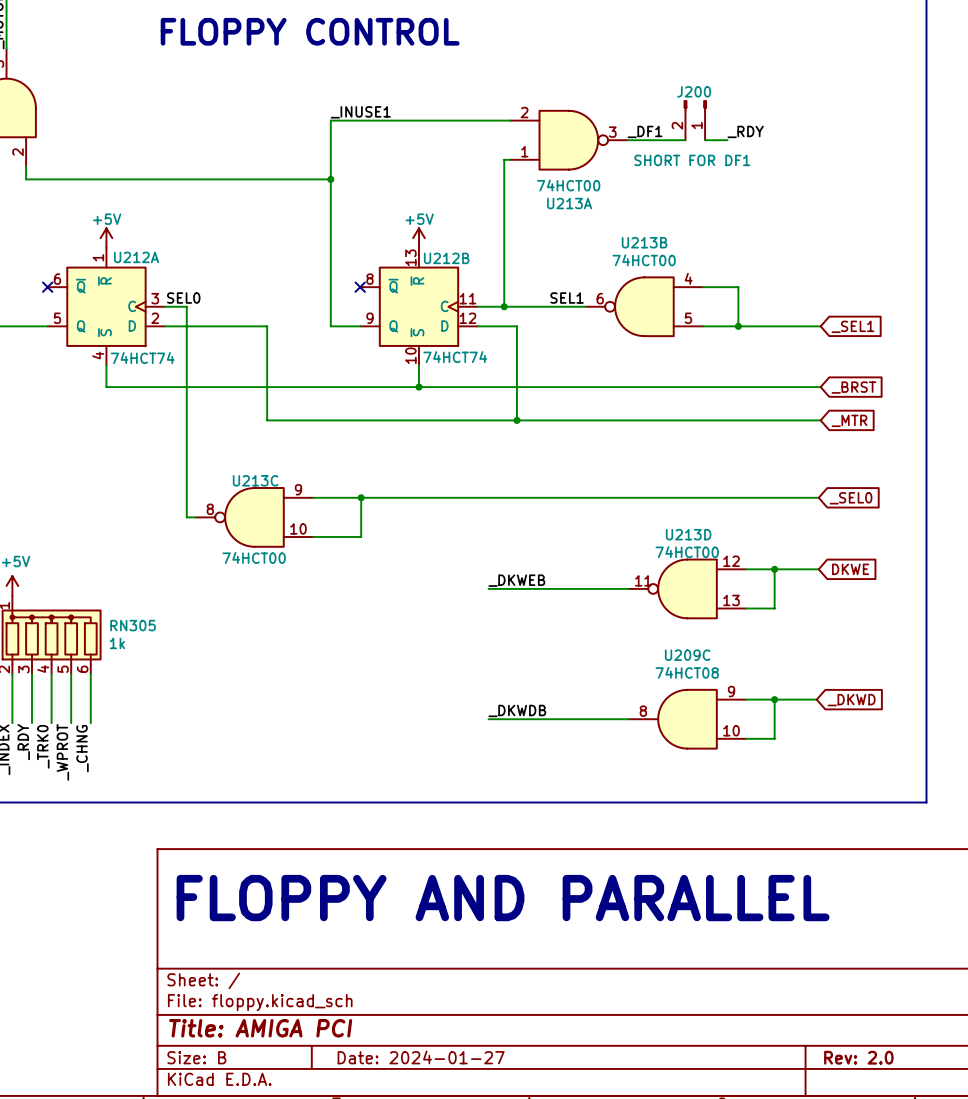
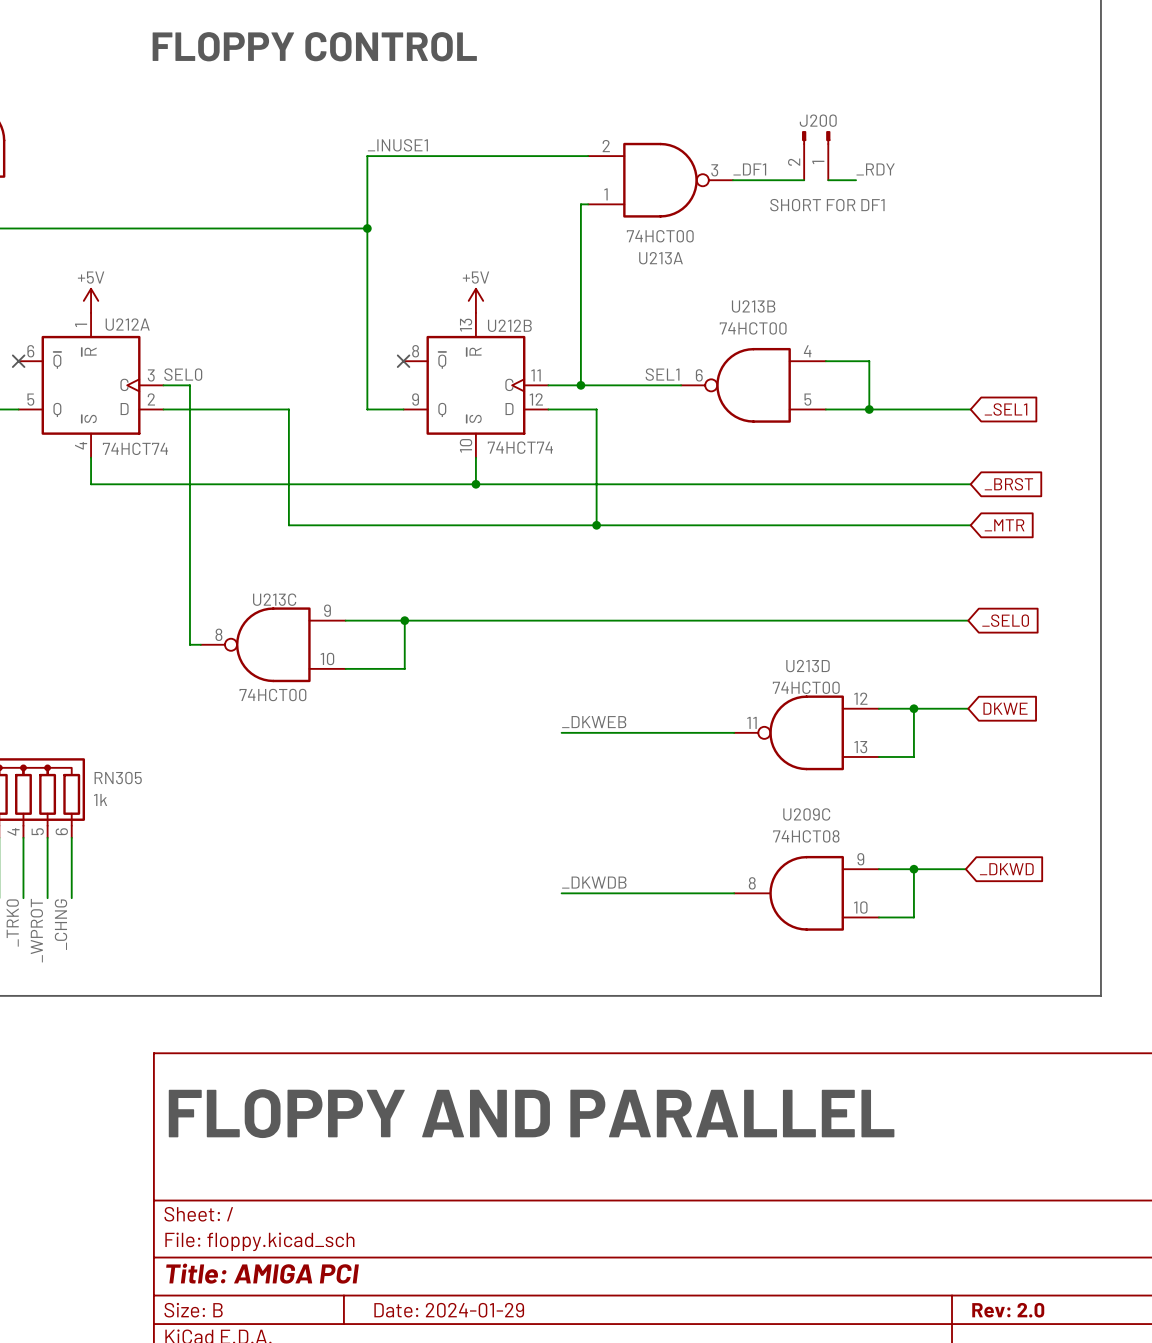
title block: Date: 2024-01-27 (421, 1057) -> Date: 2024-01-29 (449, 1310)

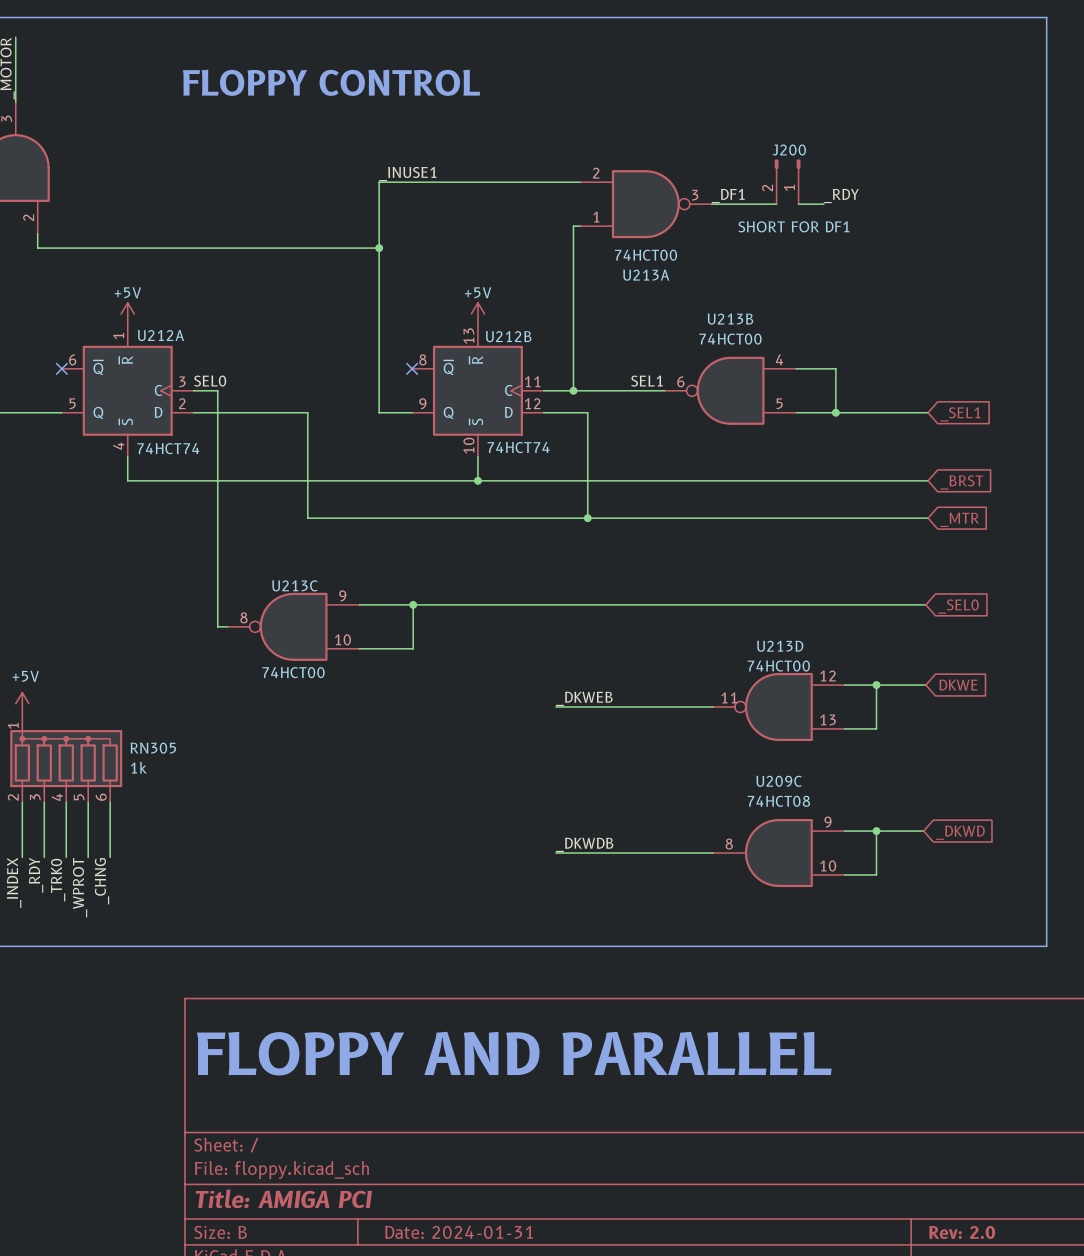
title block: Date: 2024-01-29 (449, 1310) -> Date: 2024-01-31 (459, 1232)

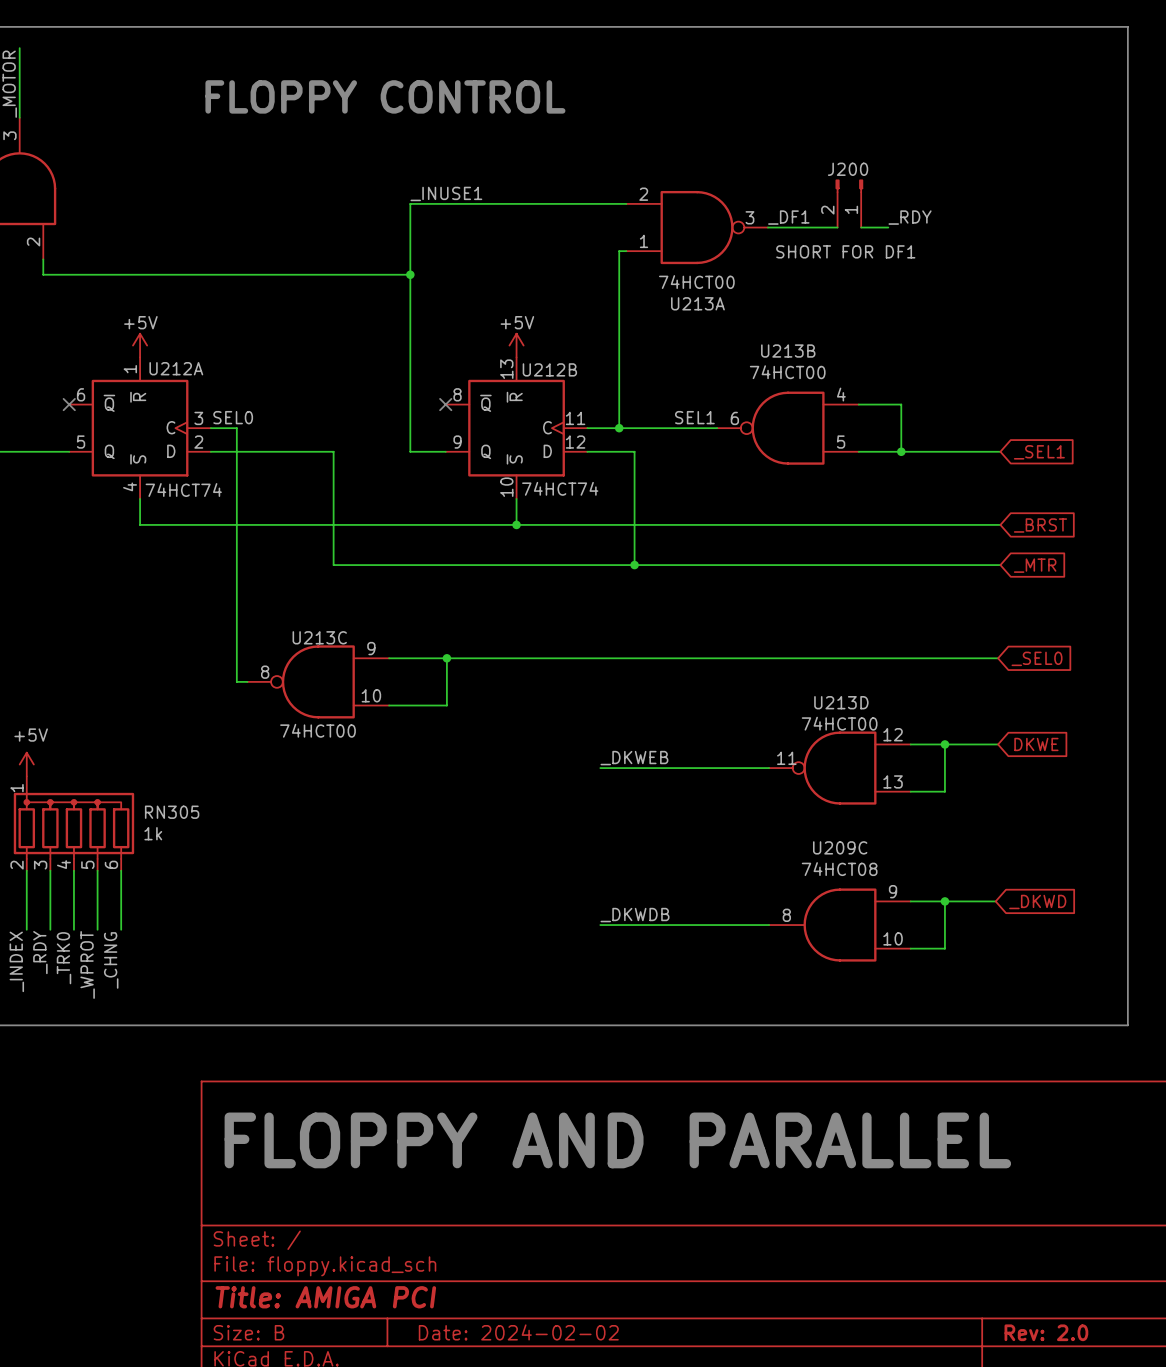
title block: Date: 2024-01-31 (459, 1232) -> Date: 2024-02-02 (518, 1332)

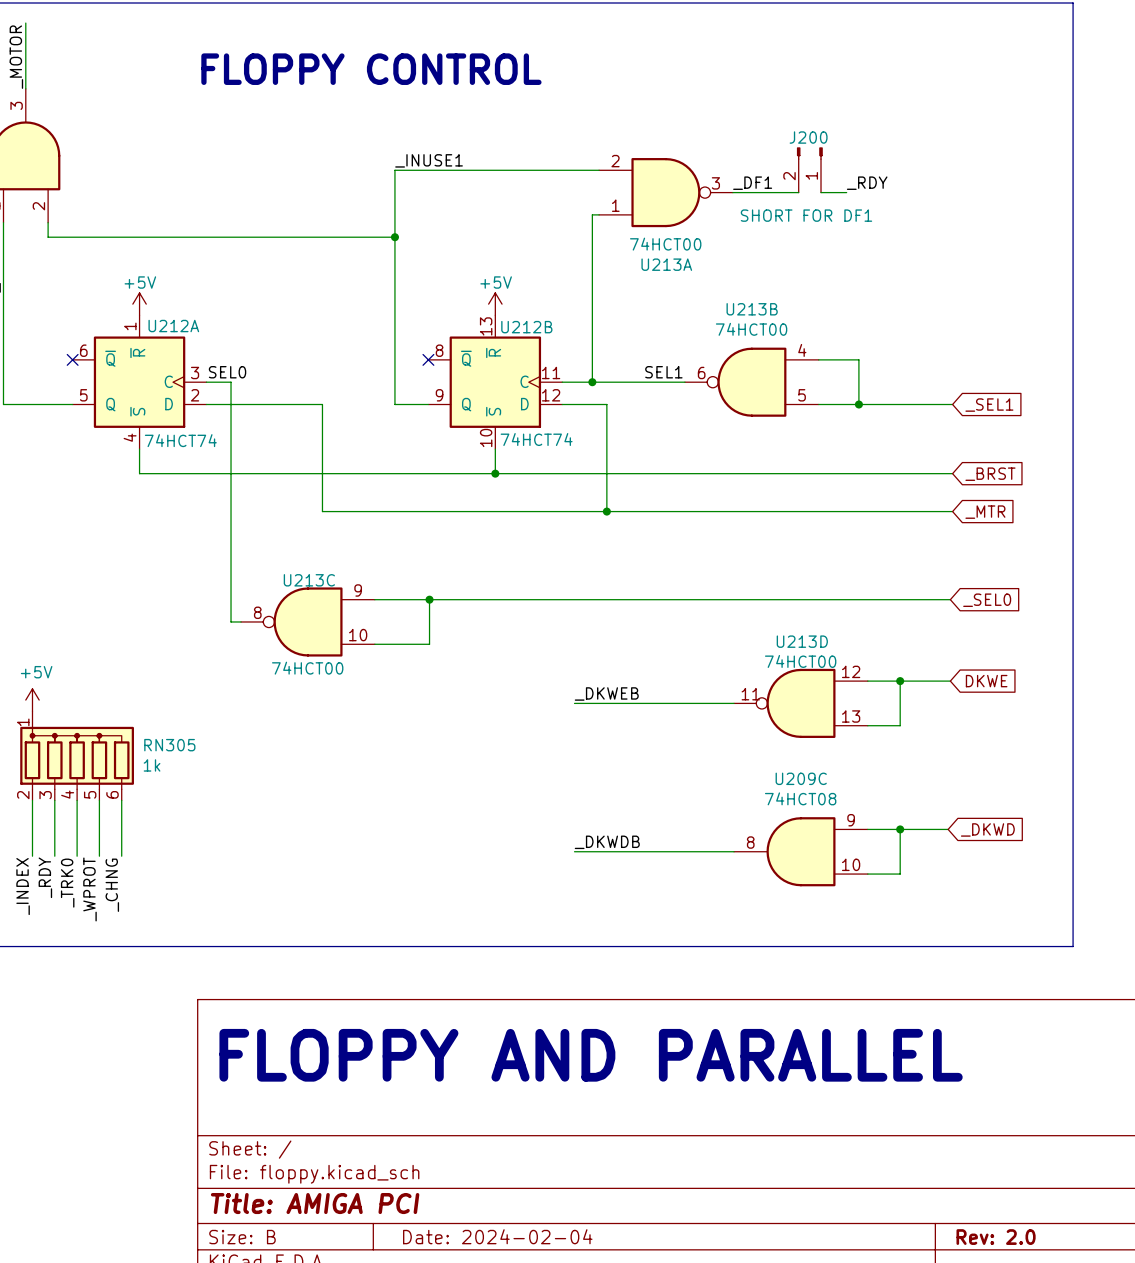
title block: Date: 2024-02-02 (518, 1332) -> Date: 2024-02-04 (497, 1236)

